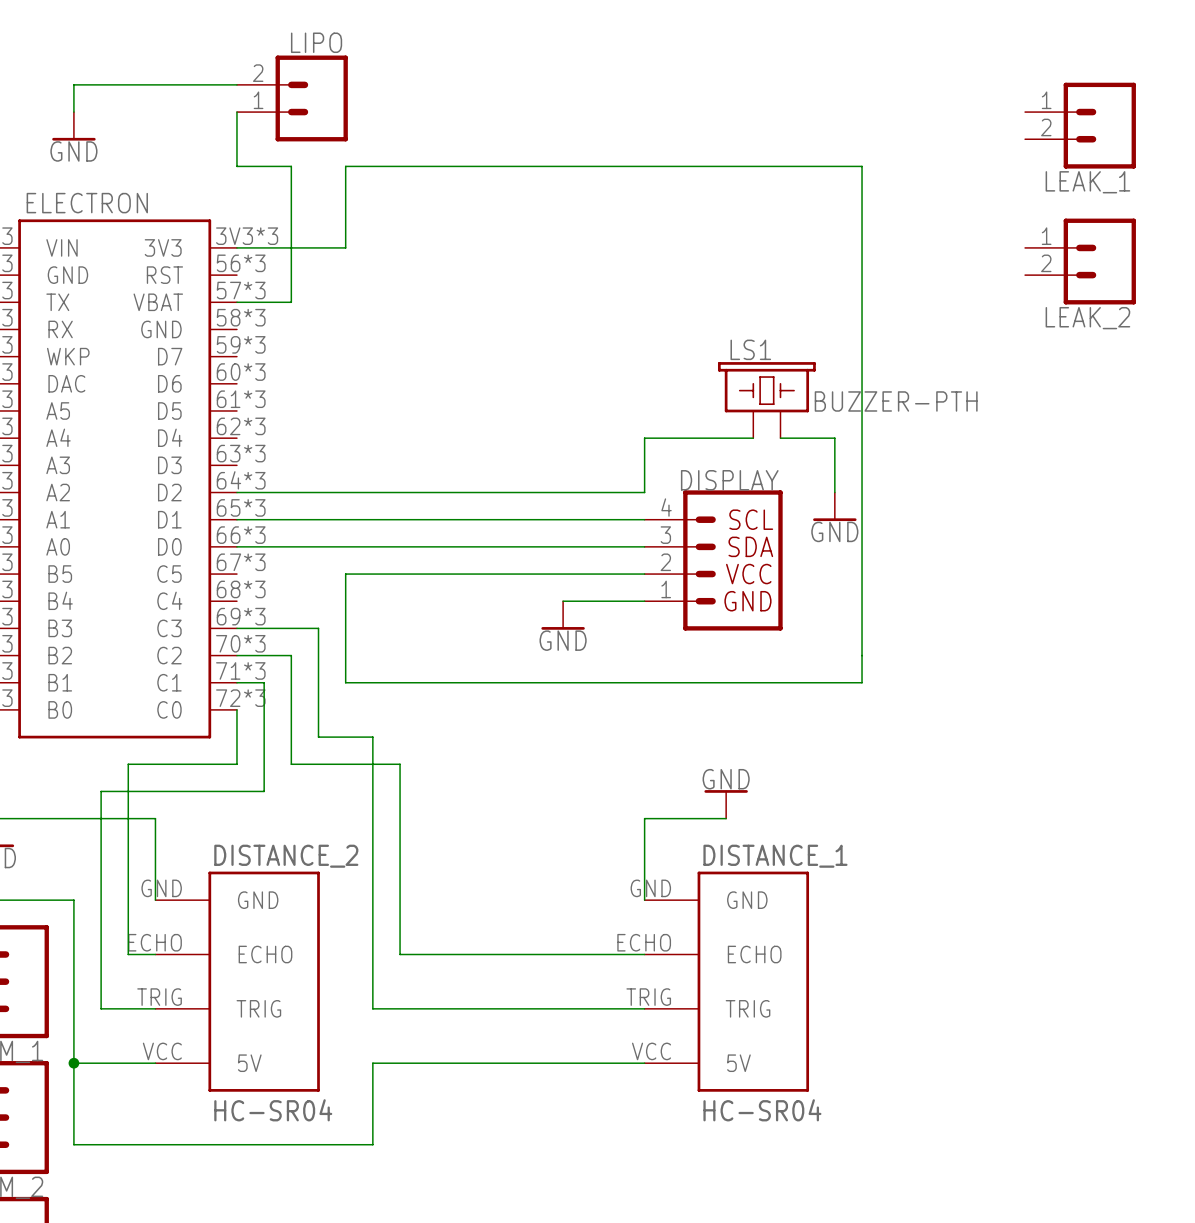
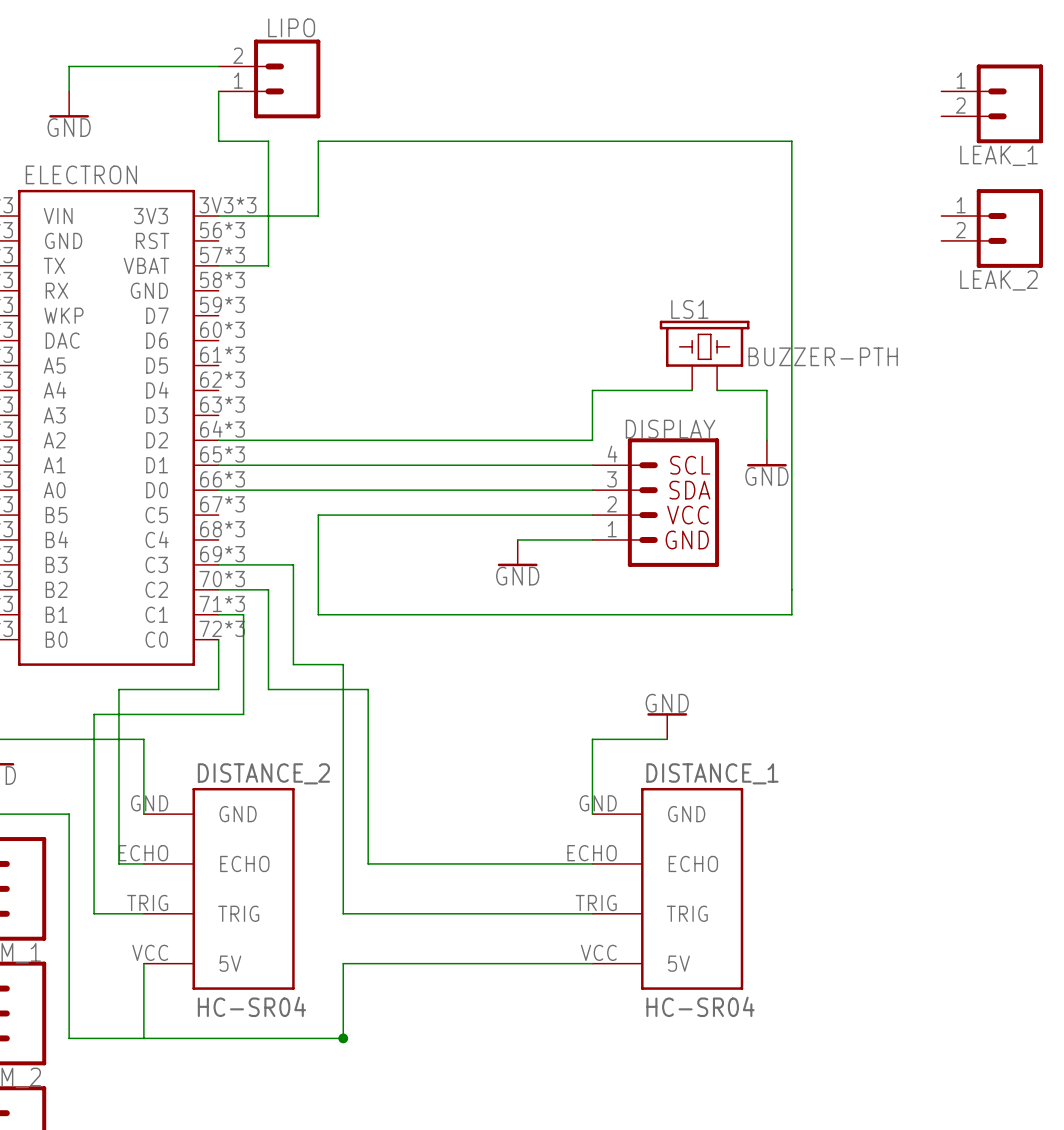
wire: (73, 1063) (155, 1063) -> (143, 1038) (143, 963)
junction: (73, 1063) -> none
junction: none -> (343, 1038)

